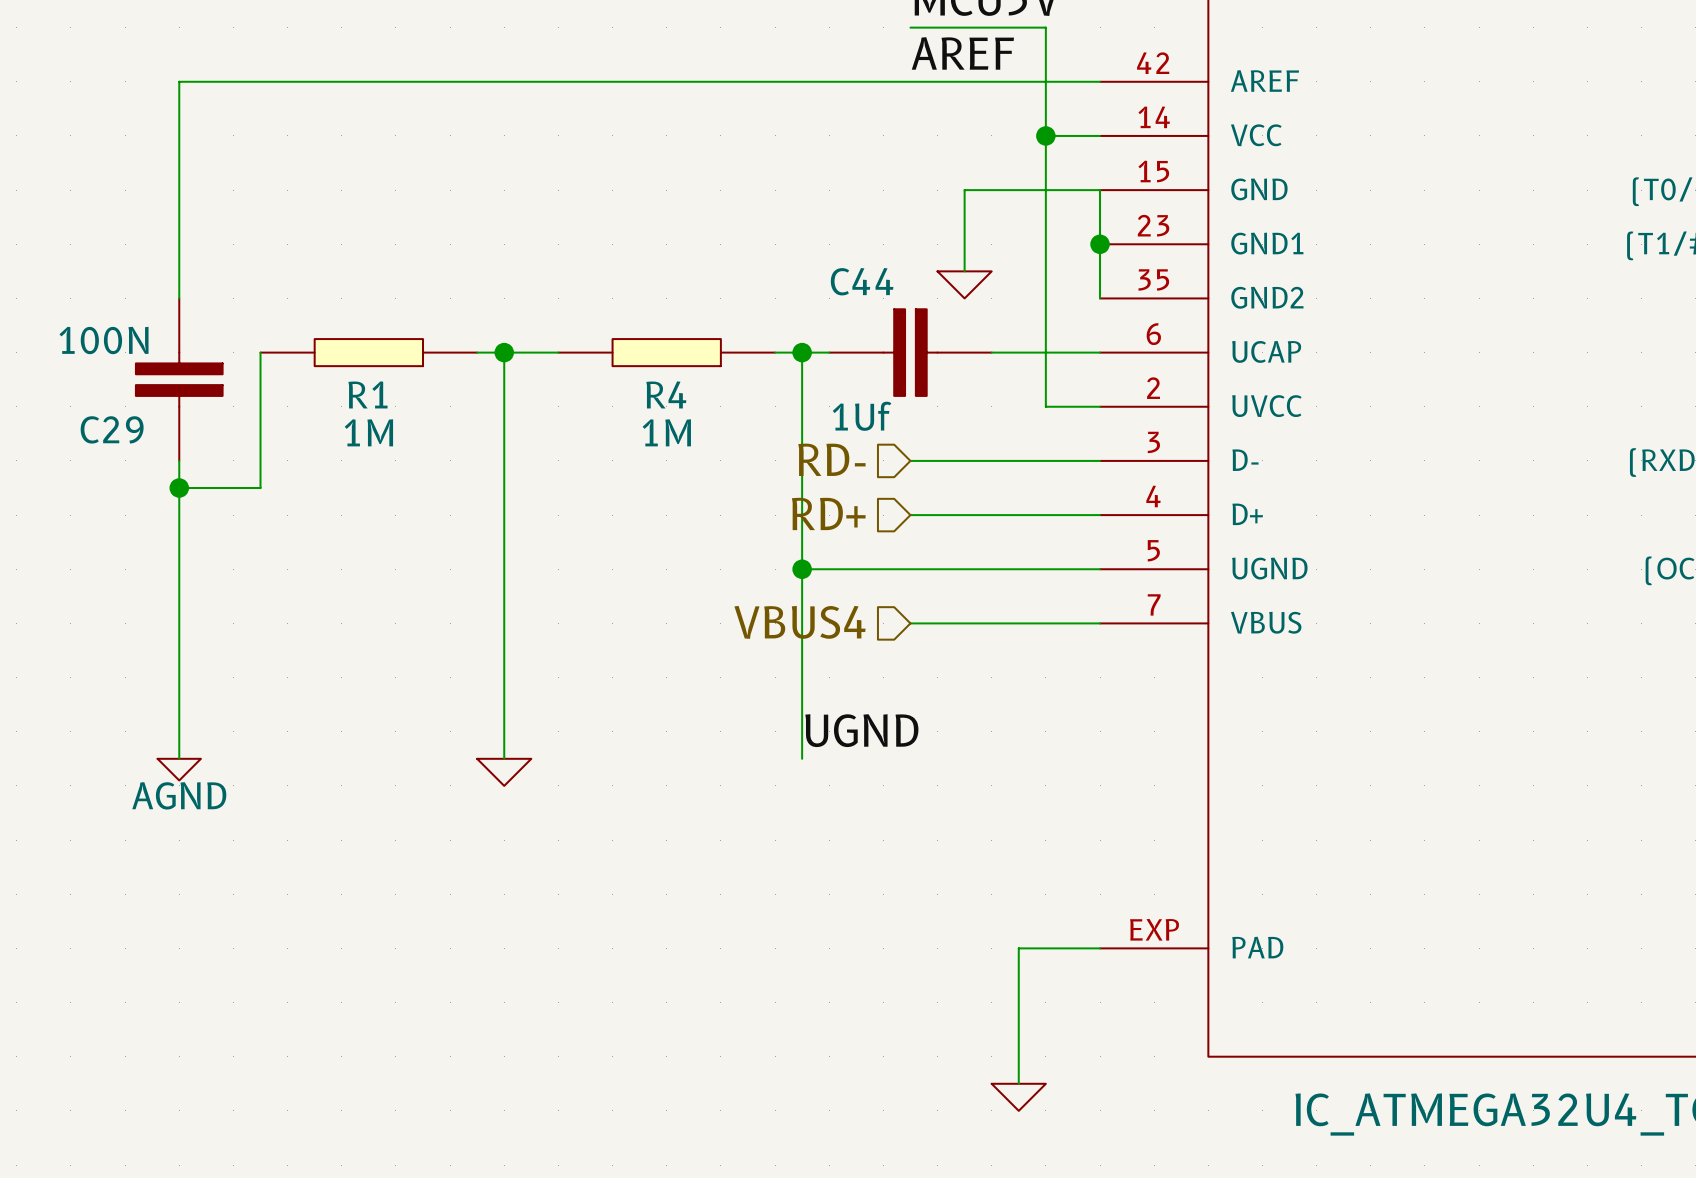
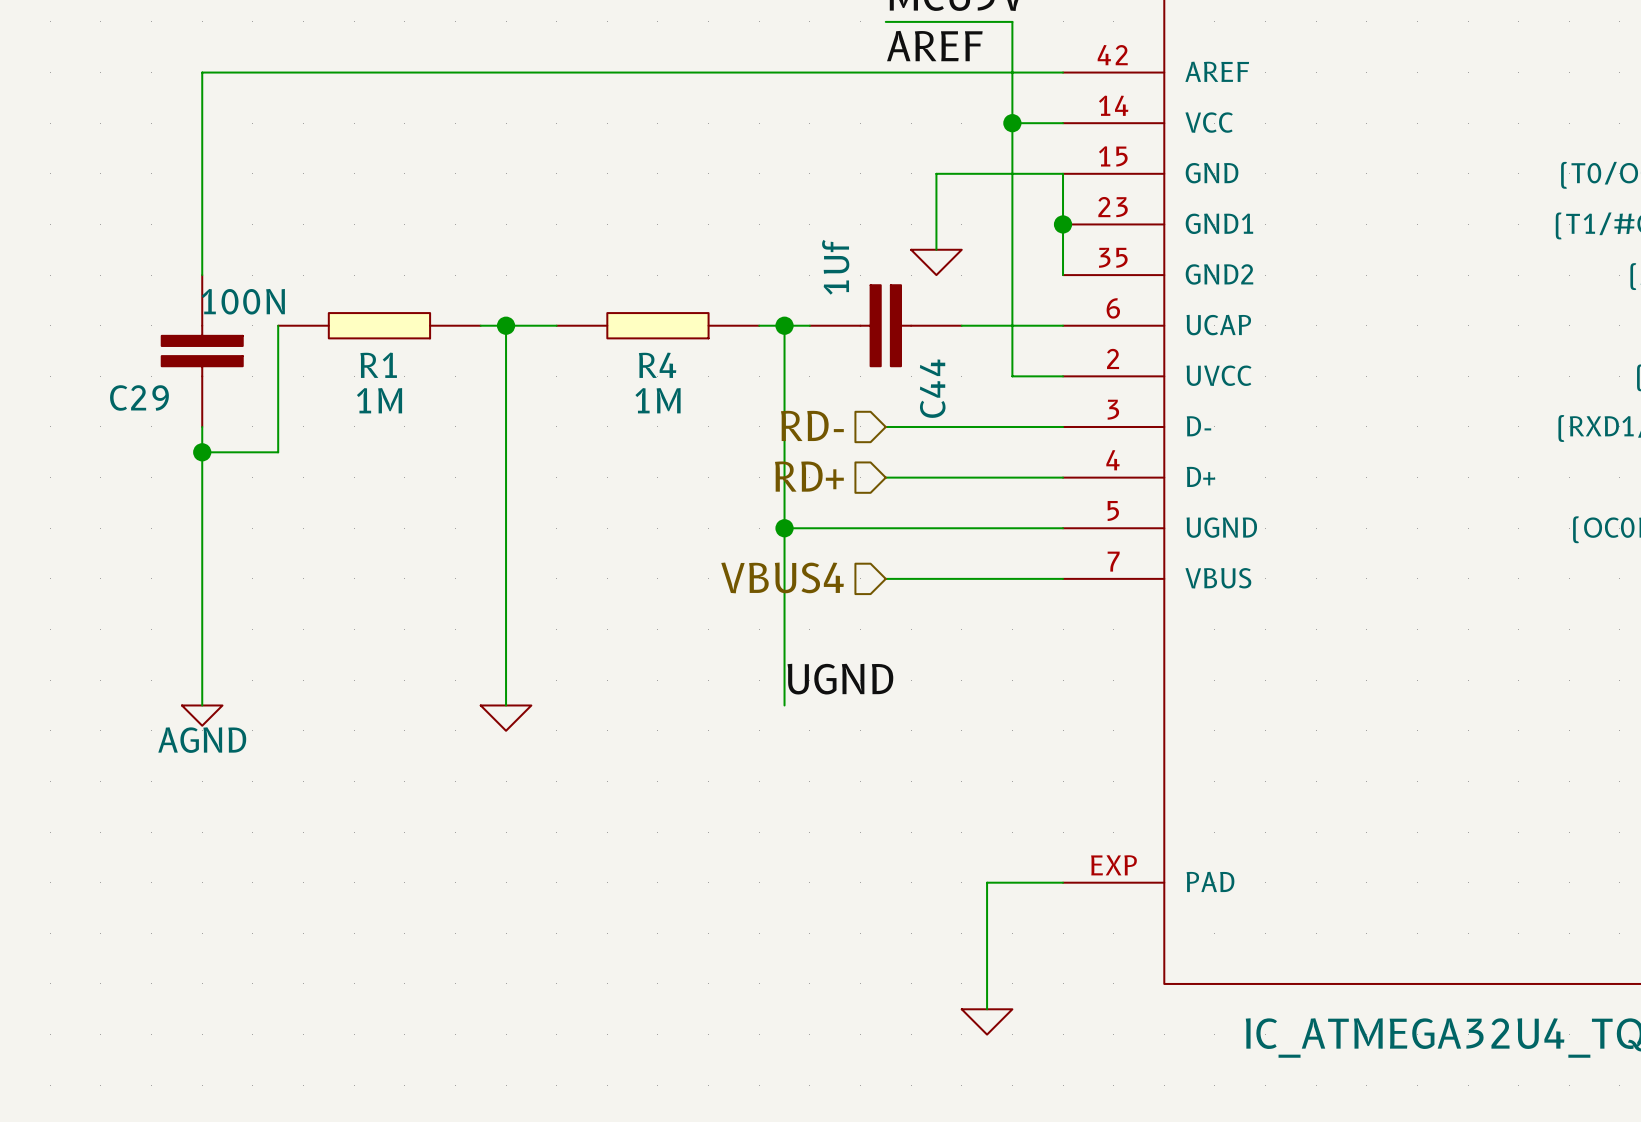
C44 name rotation: 0° (862, 281) -> 90° counterclockwise (932, 388)
C44 name position: C44 (862, 281) -> C44 (932, 388)
C29 value position: 100N (104, 340) -> 100N (243, 301)
C44 value rotation: 0° (862, 416) -> 90° counterclockwise (835, 267)
C44 value position: 1Uf (862, 416) -> 1Uf (835, 267)

